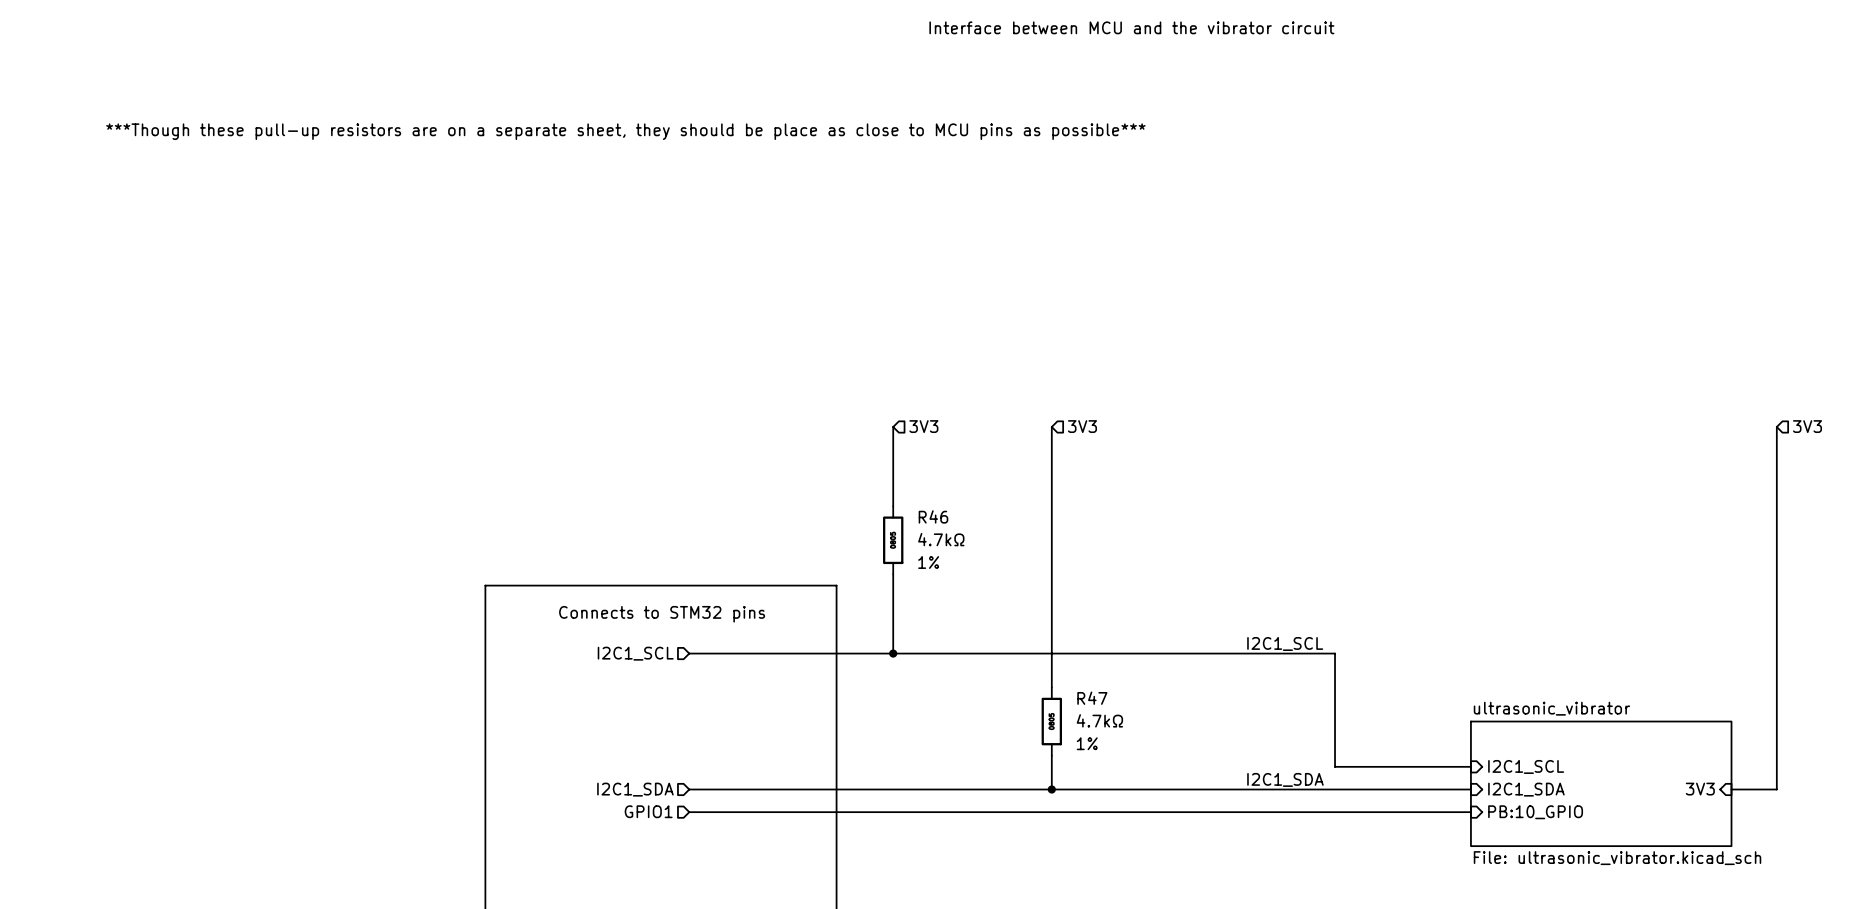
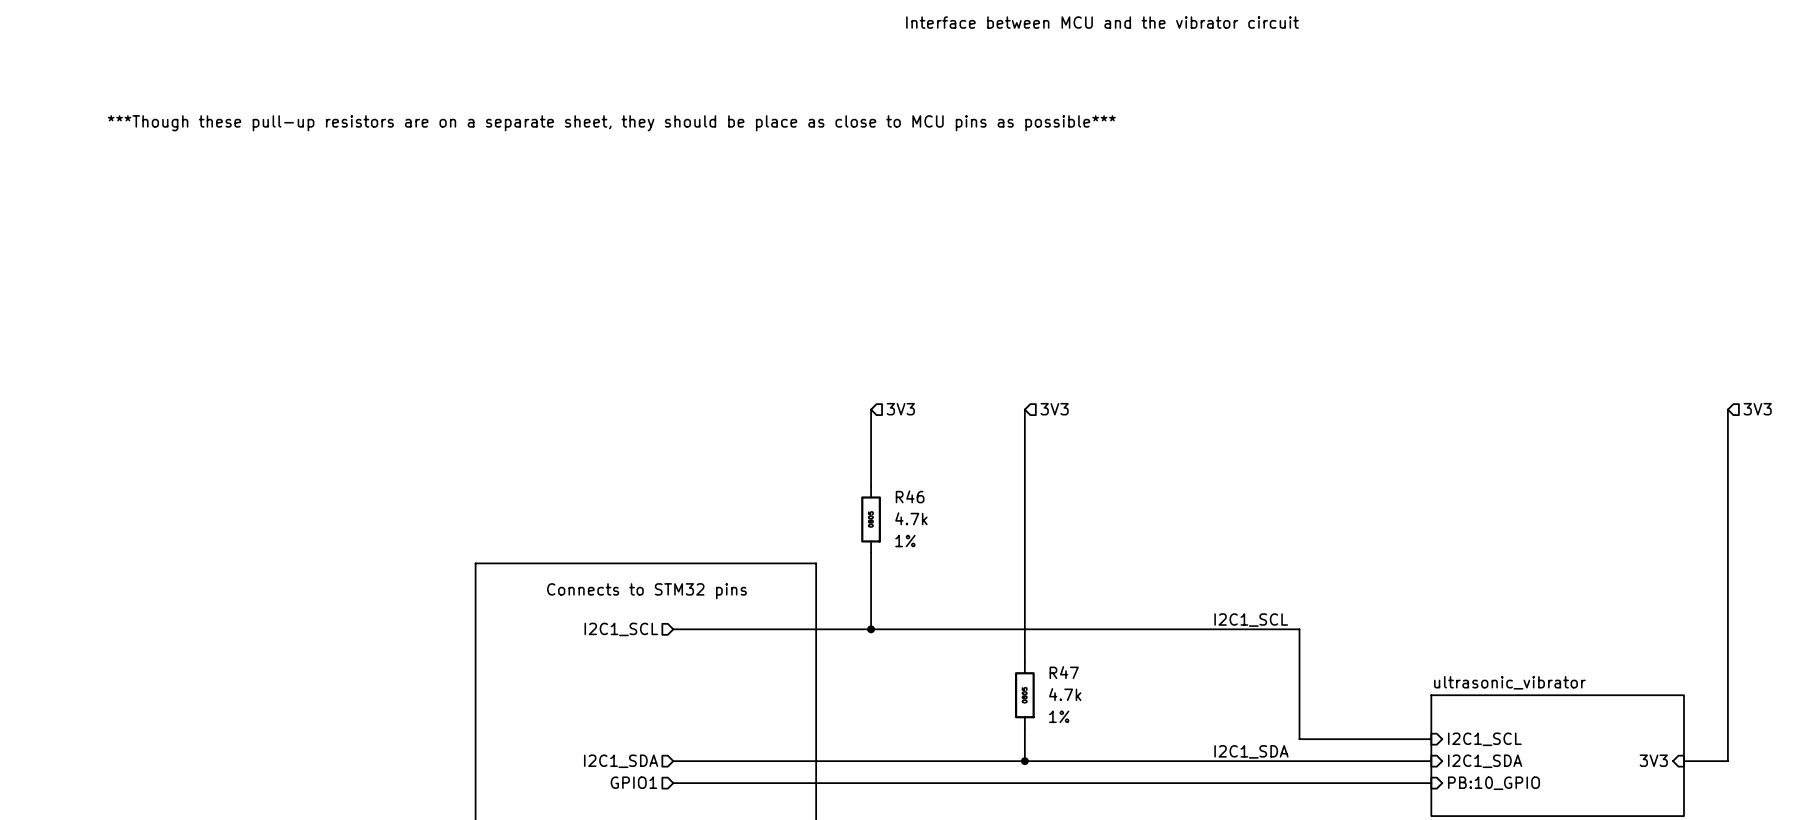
R46 value: 4.7kΩ (941, 539) -> 4.7k (911, 518)
R47 value: 4.7kΩ (1099, 720) -> 4.7k (1065, 694)

